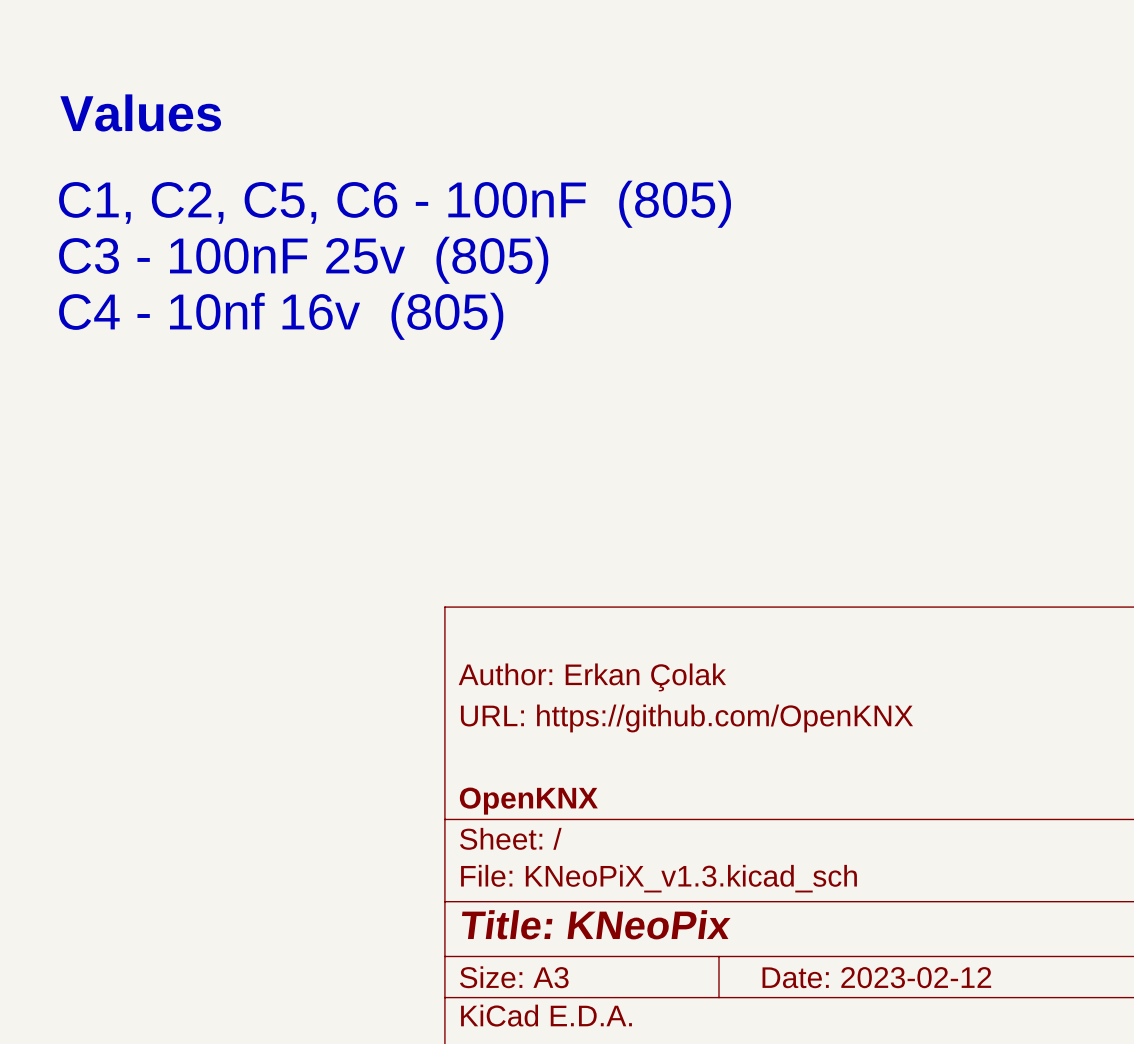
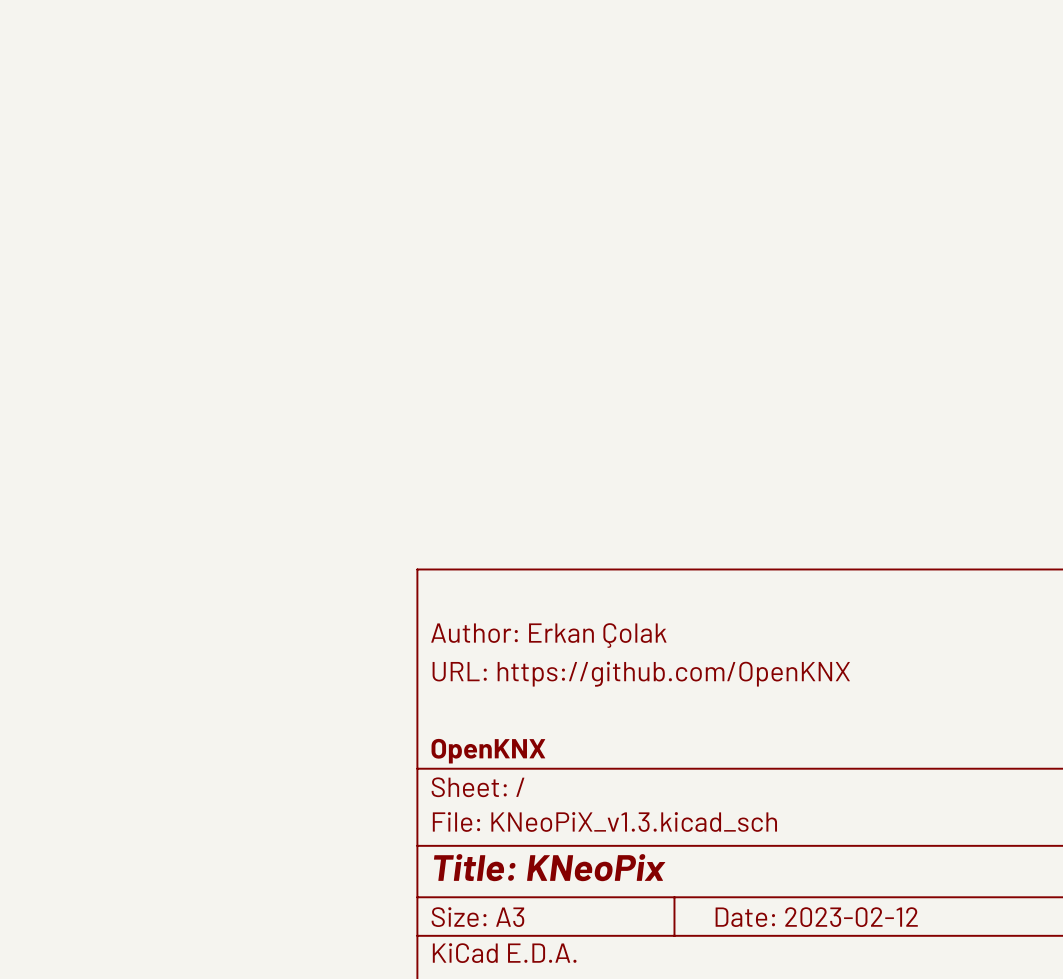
text: Values (140, 112) -> none
text: C1, C2, C5, C6 - 100nF (805) (395, 204) -> none
text: C3 - 100nF 25v (805) (303, 260) -> none
text: C4 - 10nf 16v (805) (281, 316) -> none

